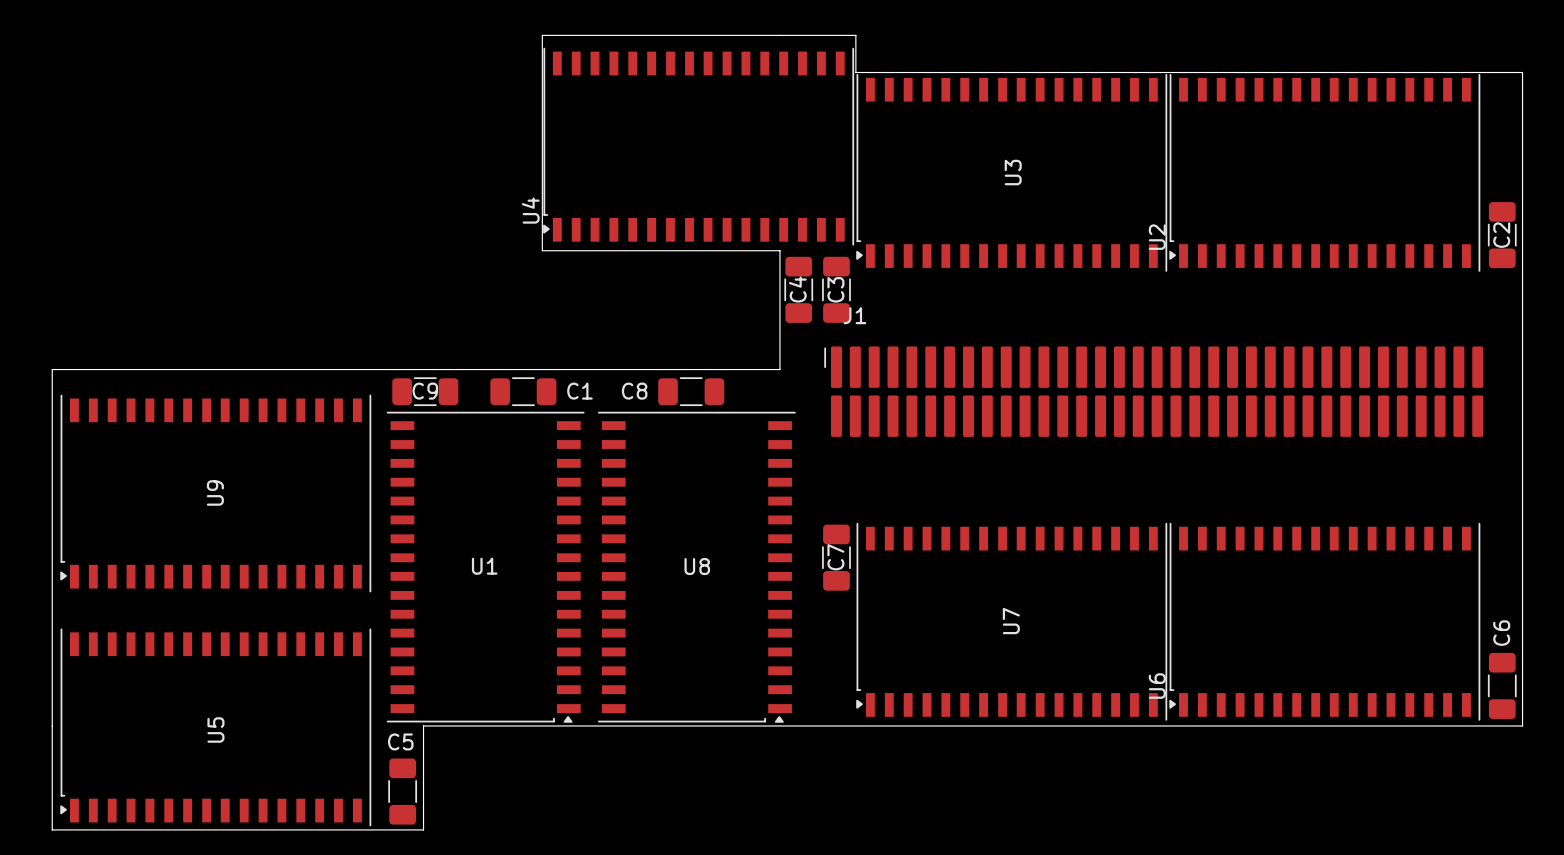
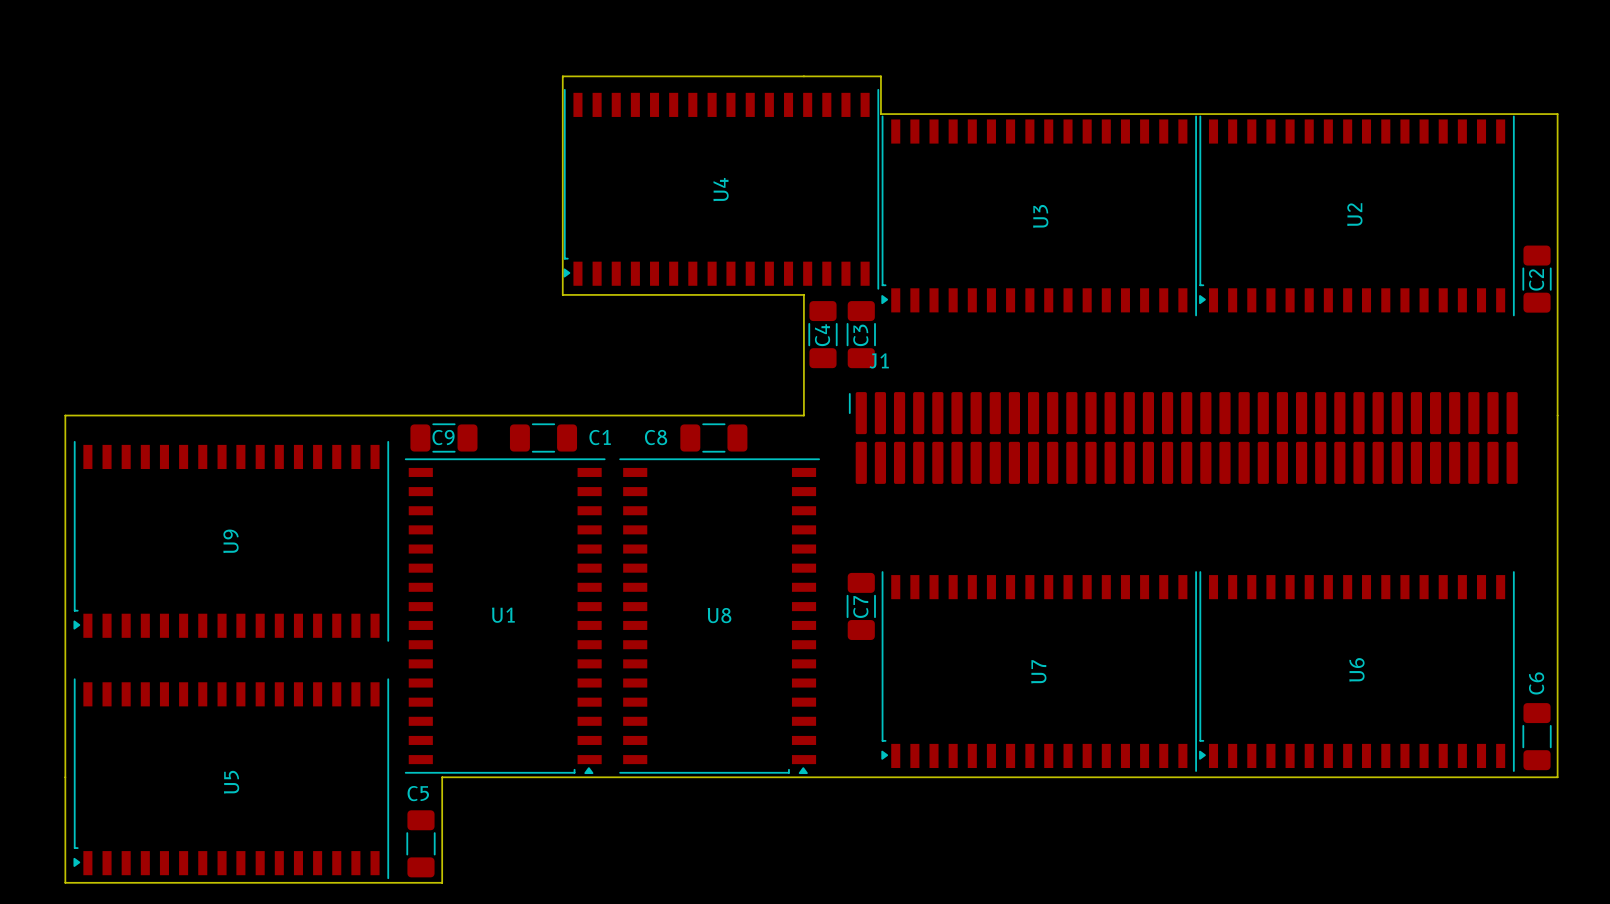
U4 name position: U4 (530, 210) -> U4 (721, 189)
U2 name position: U2 (1157, 237) -> U2 (1354, 214)
U6 name position: U6 (1157, 686) -> U6 (1356, 669)

